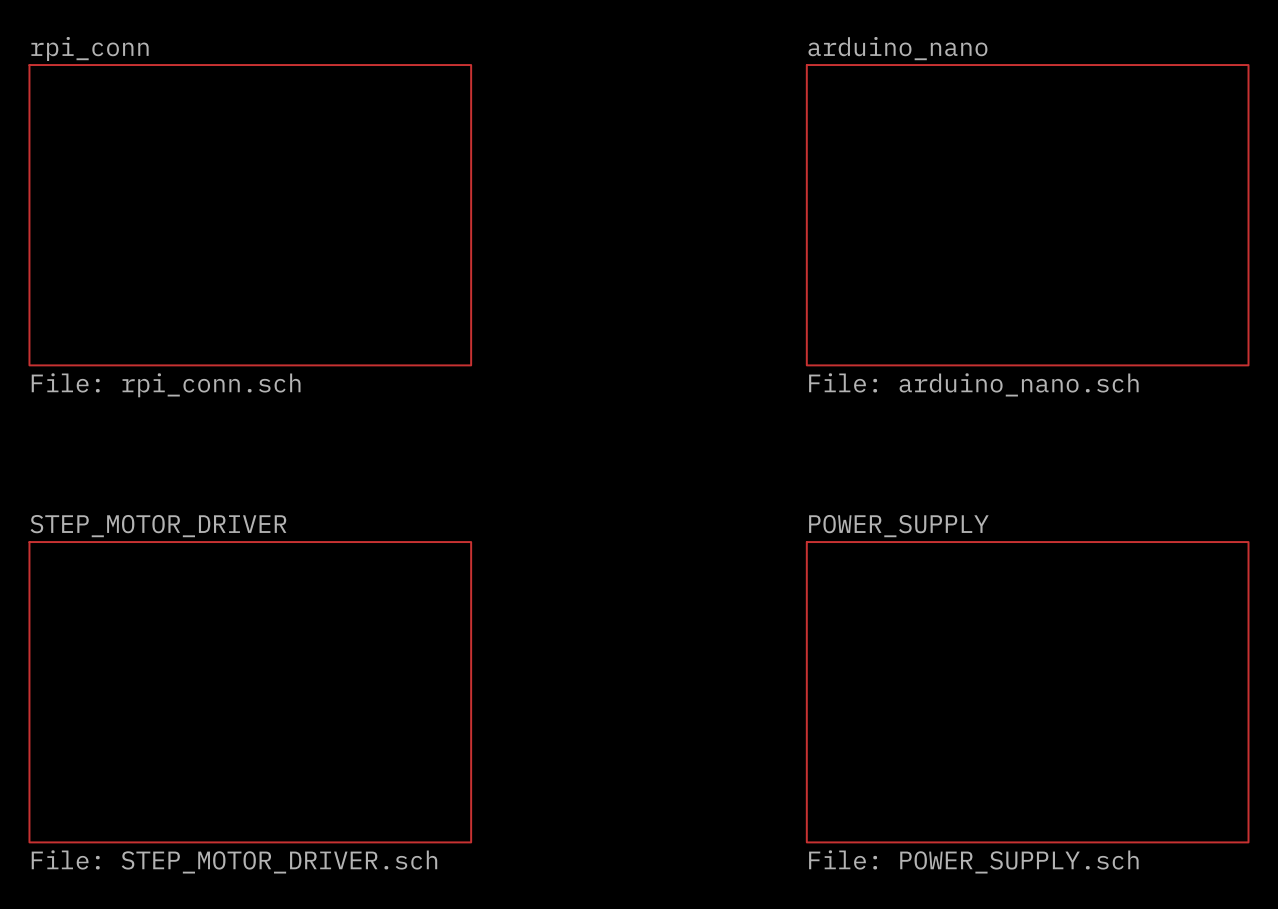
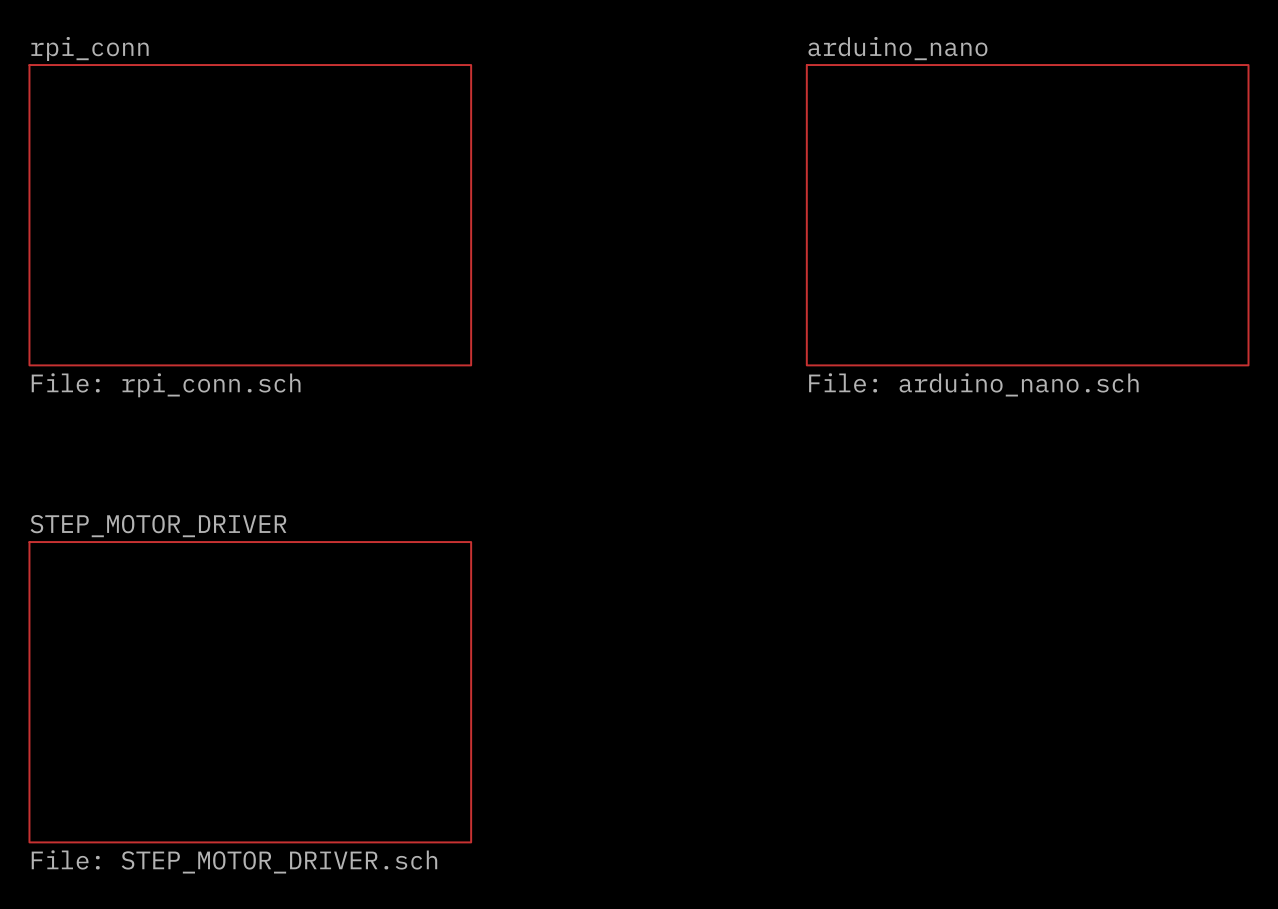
sheet POWER_SUPPLY: File: POWER_SUPPLY.sch (1027, 692) -> none

